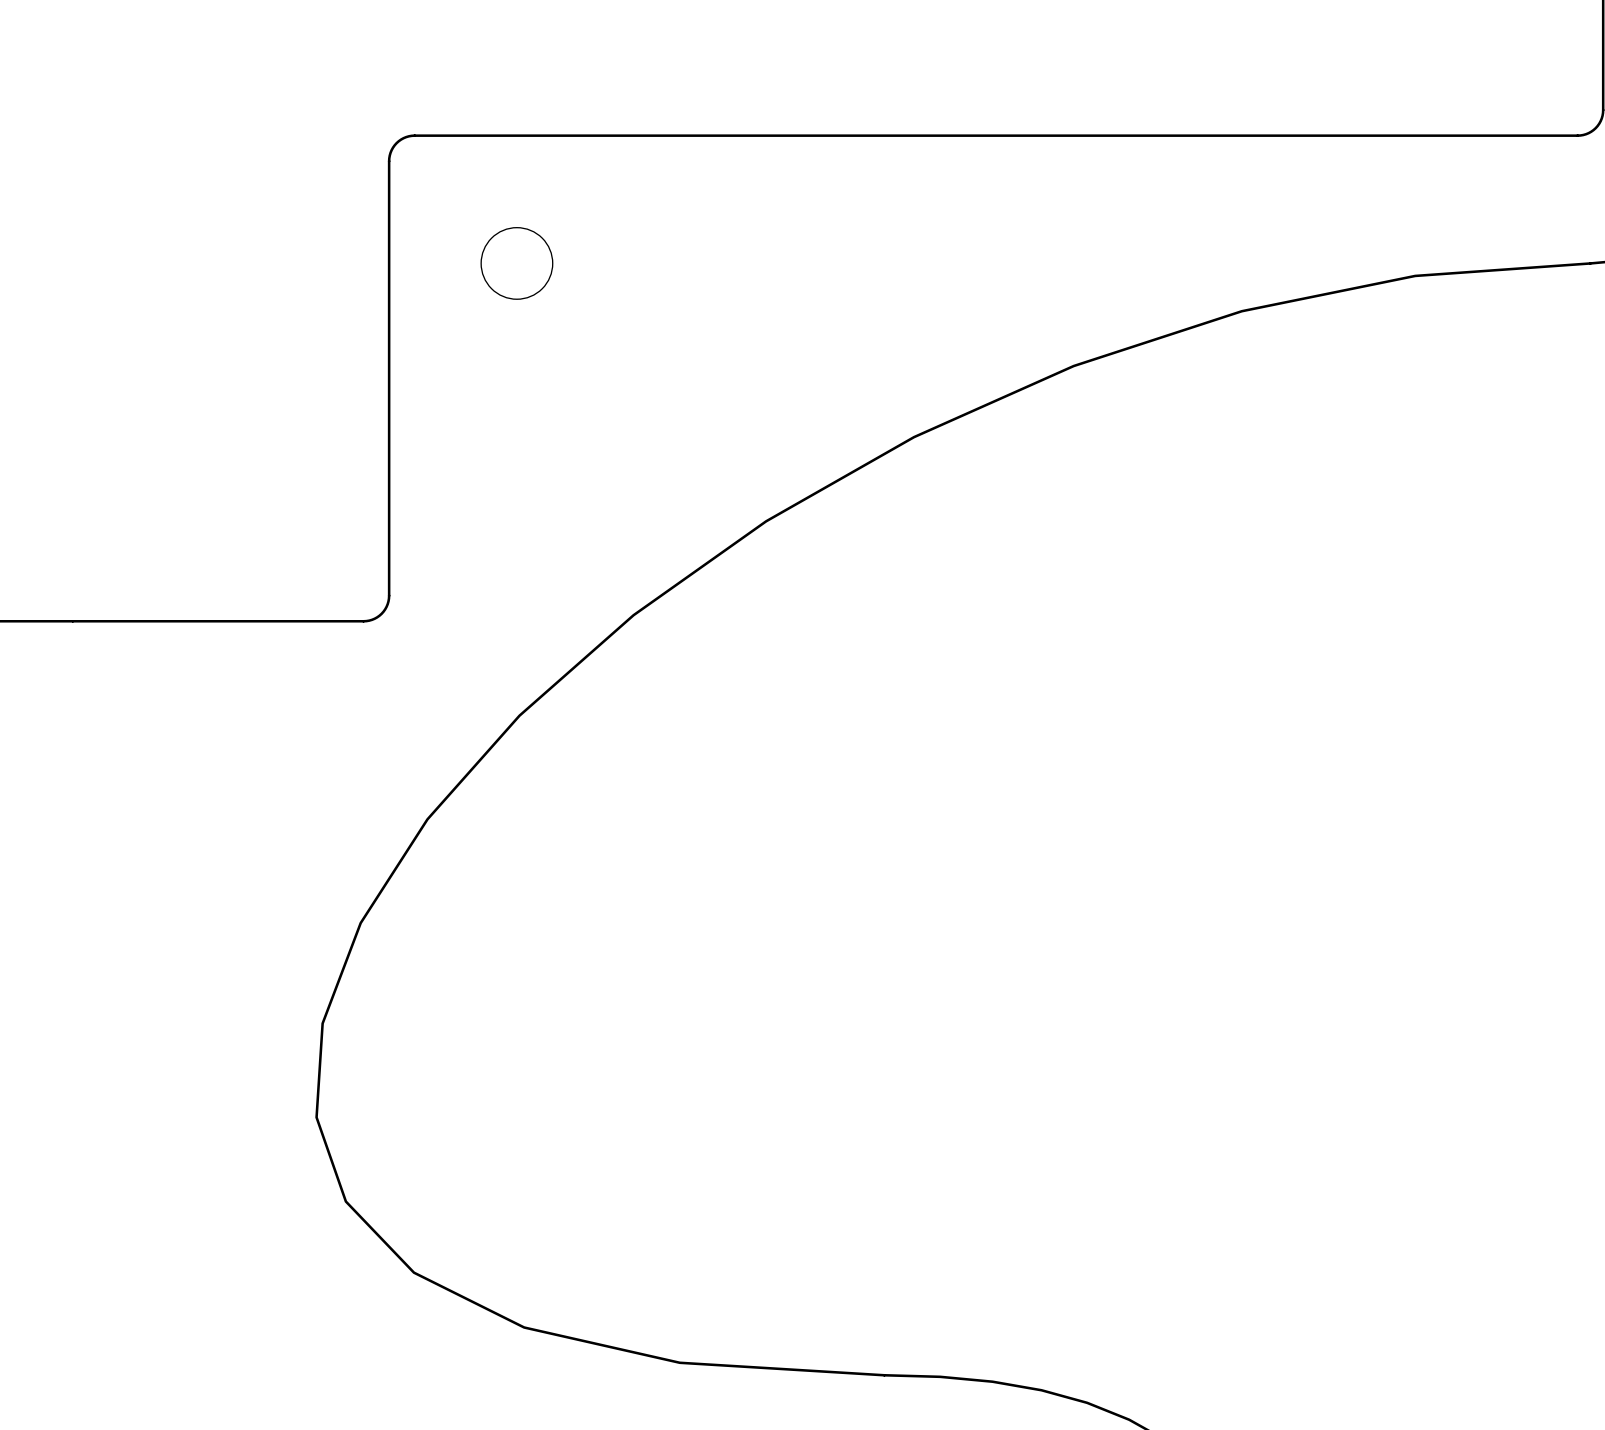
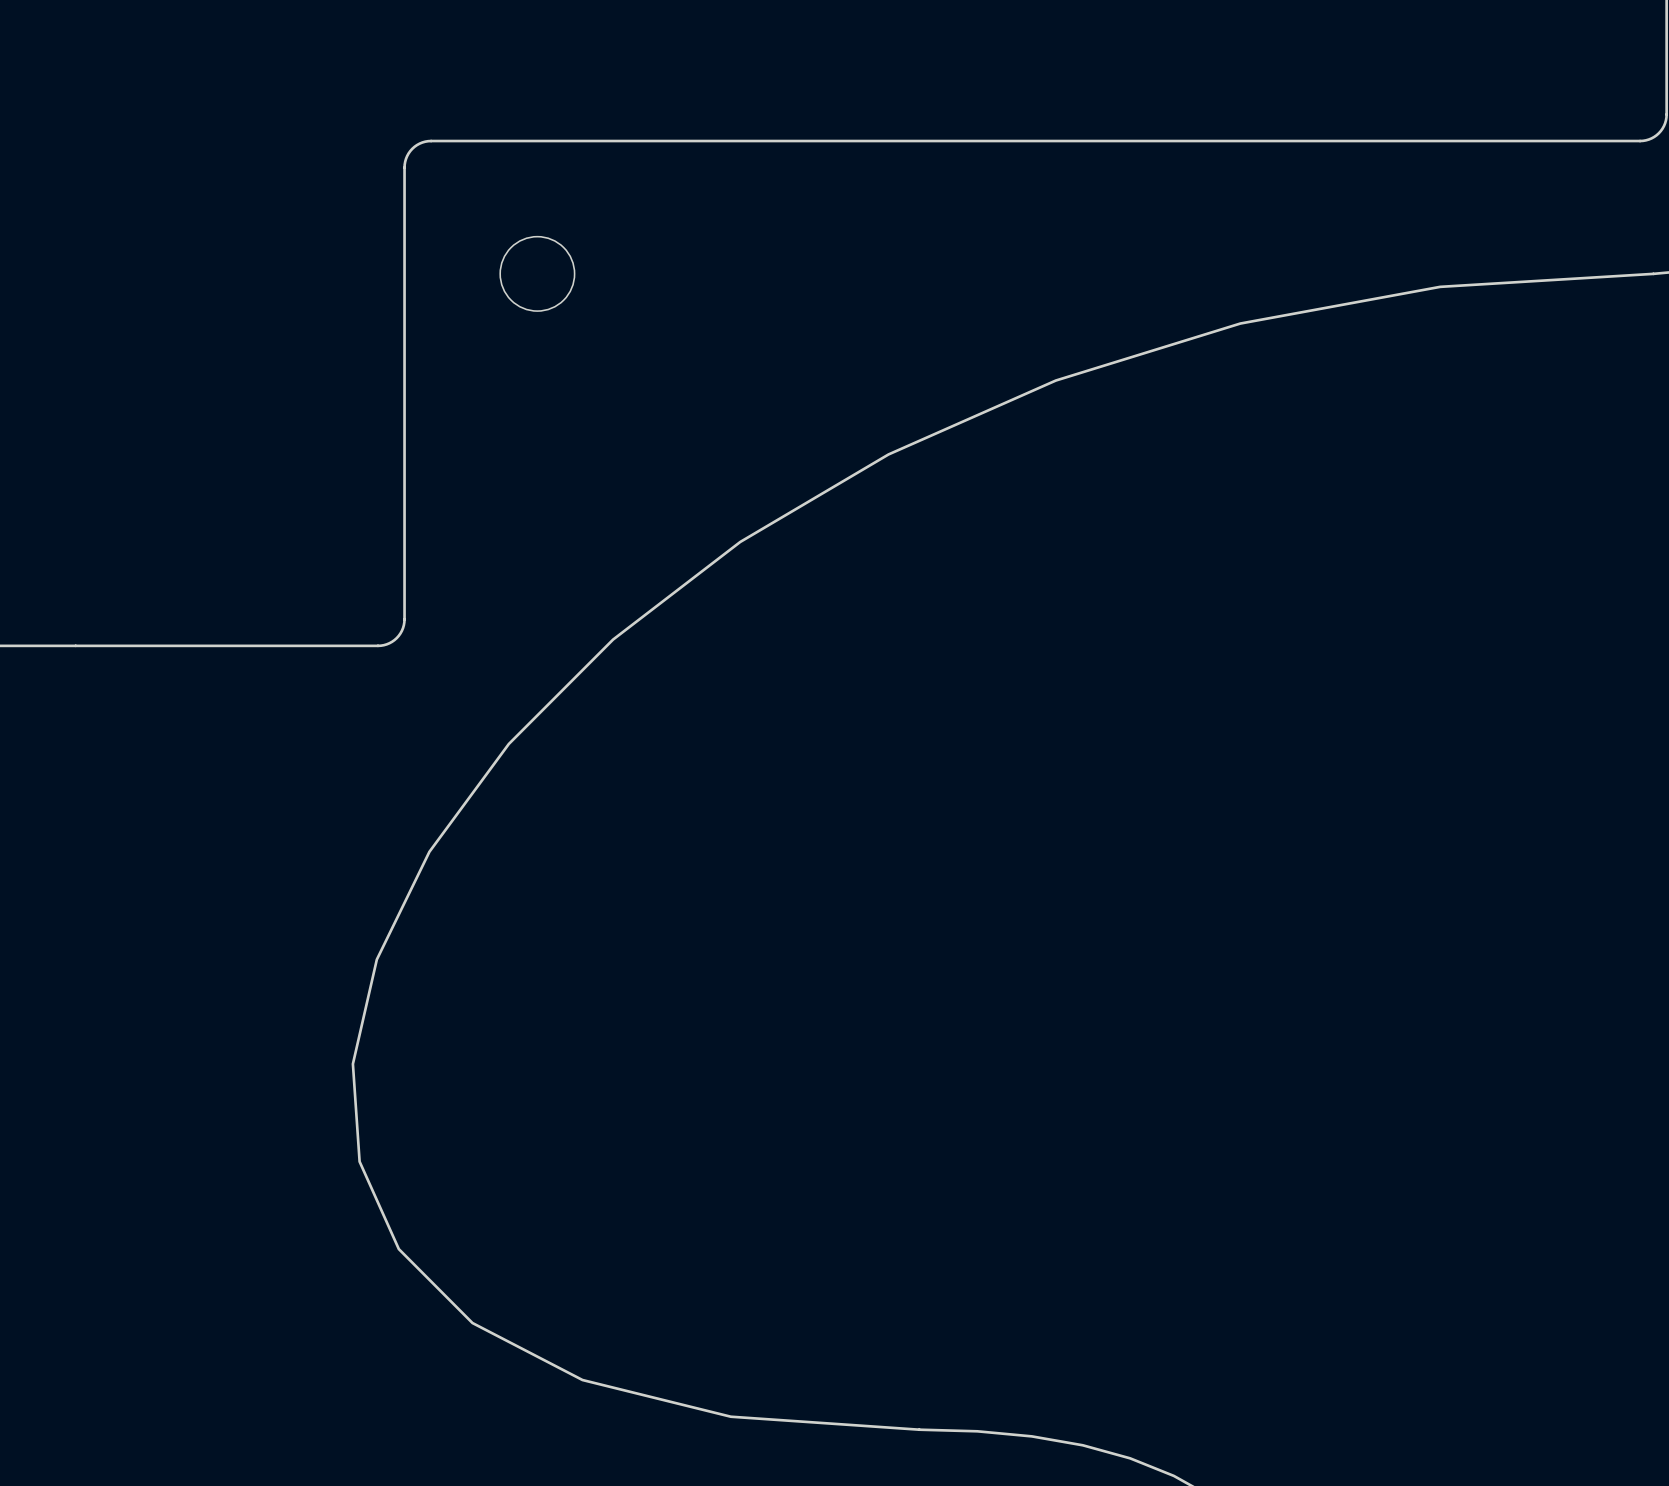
board edge: (1590, 263) (1415, 275) (1241, 311) (1073, 366) (914, 437) (766, 521) (633, 615) (519, 715) (427, 819) (360, 923) (322, 1023) (316, 1117) (345, 1201) (413, 1272) (524, 1327) (679, 1362) (884, 1375) -> (1653, 273) (1440, 286) (1240, 323) (1055, 380) (888, 454) (740, 541) (613, 639) (508, 743) (429, 851) (376, 959) (352, 1063) (359, 1161) (398, 1249) (472, 1323) (582, 1380) (730, 1416) (919, 1429)

